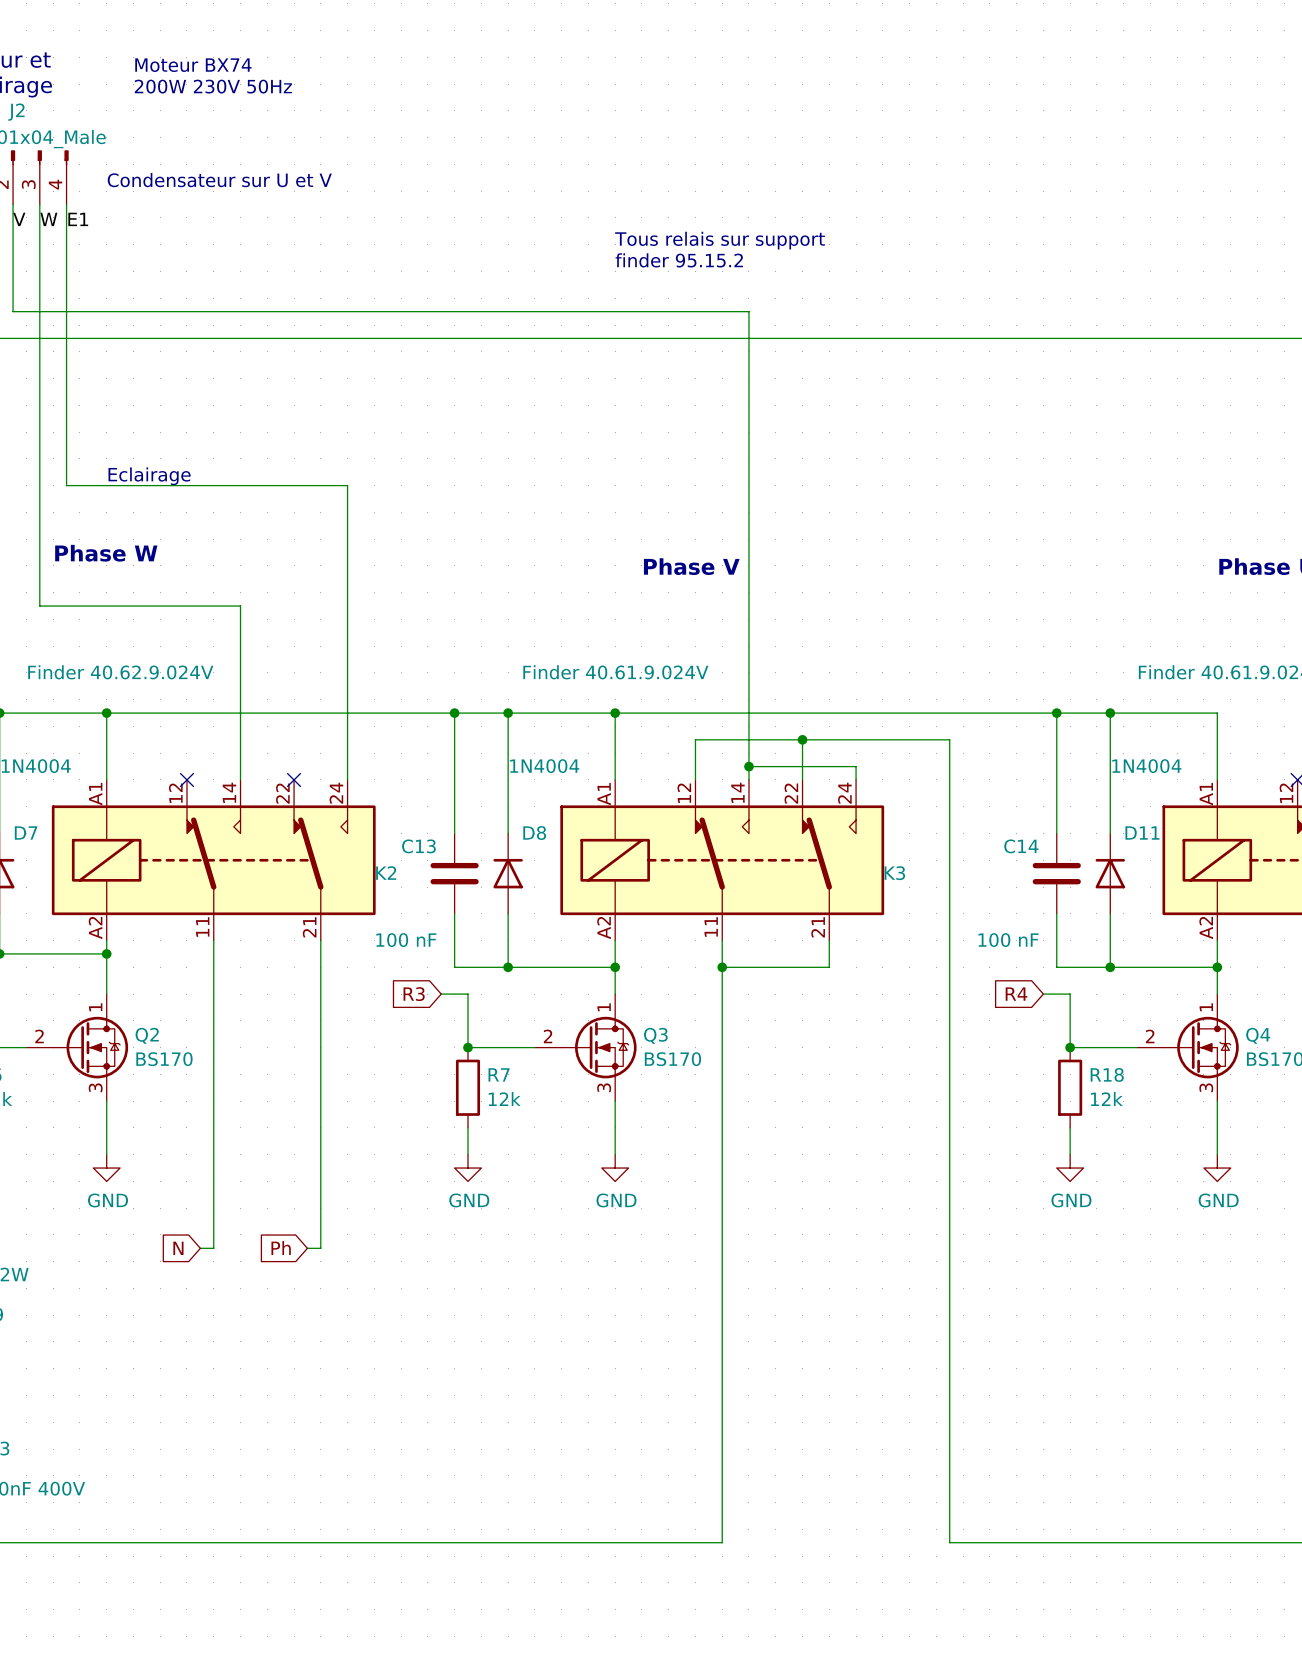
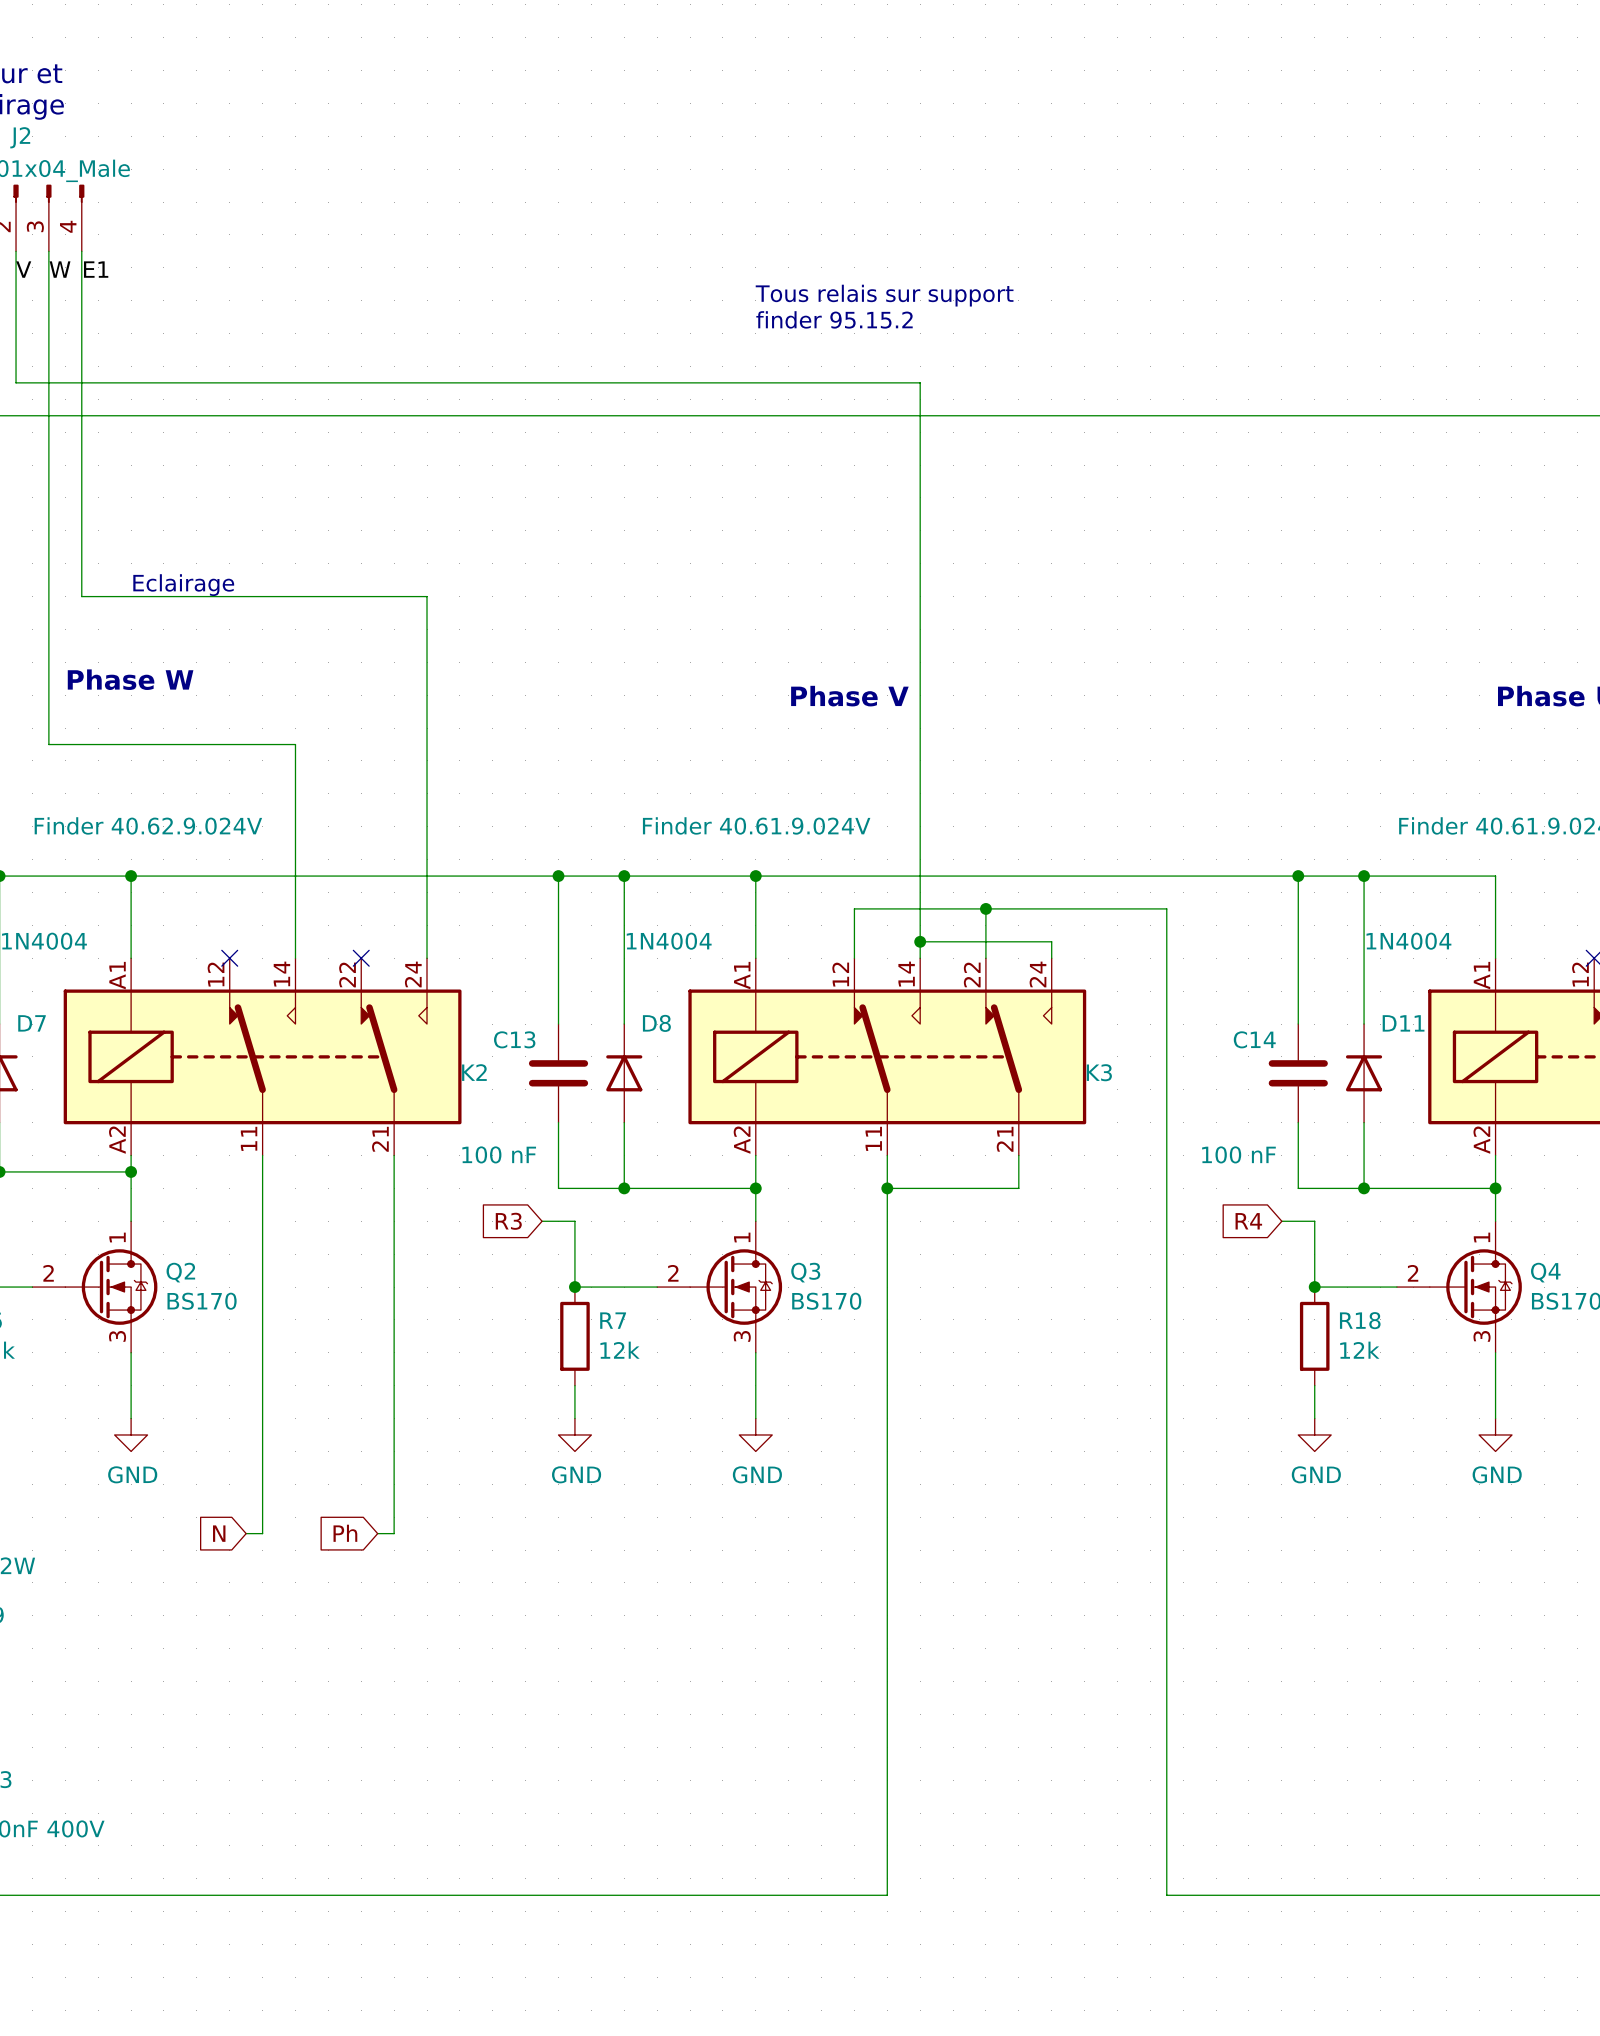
text: Moteur BX74 (193, 65) -> none
text: 200W 230V 50Hz (213, 86) -> none
text: Condensateur sur U et V (219, 180) -> none

